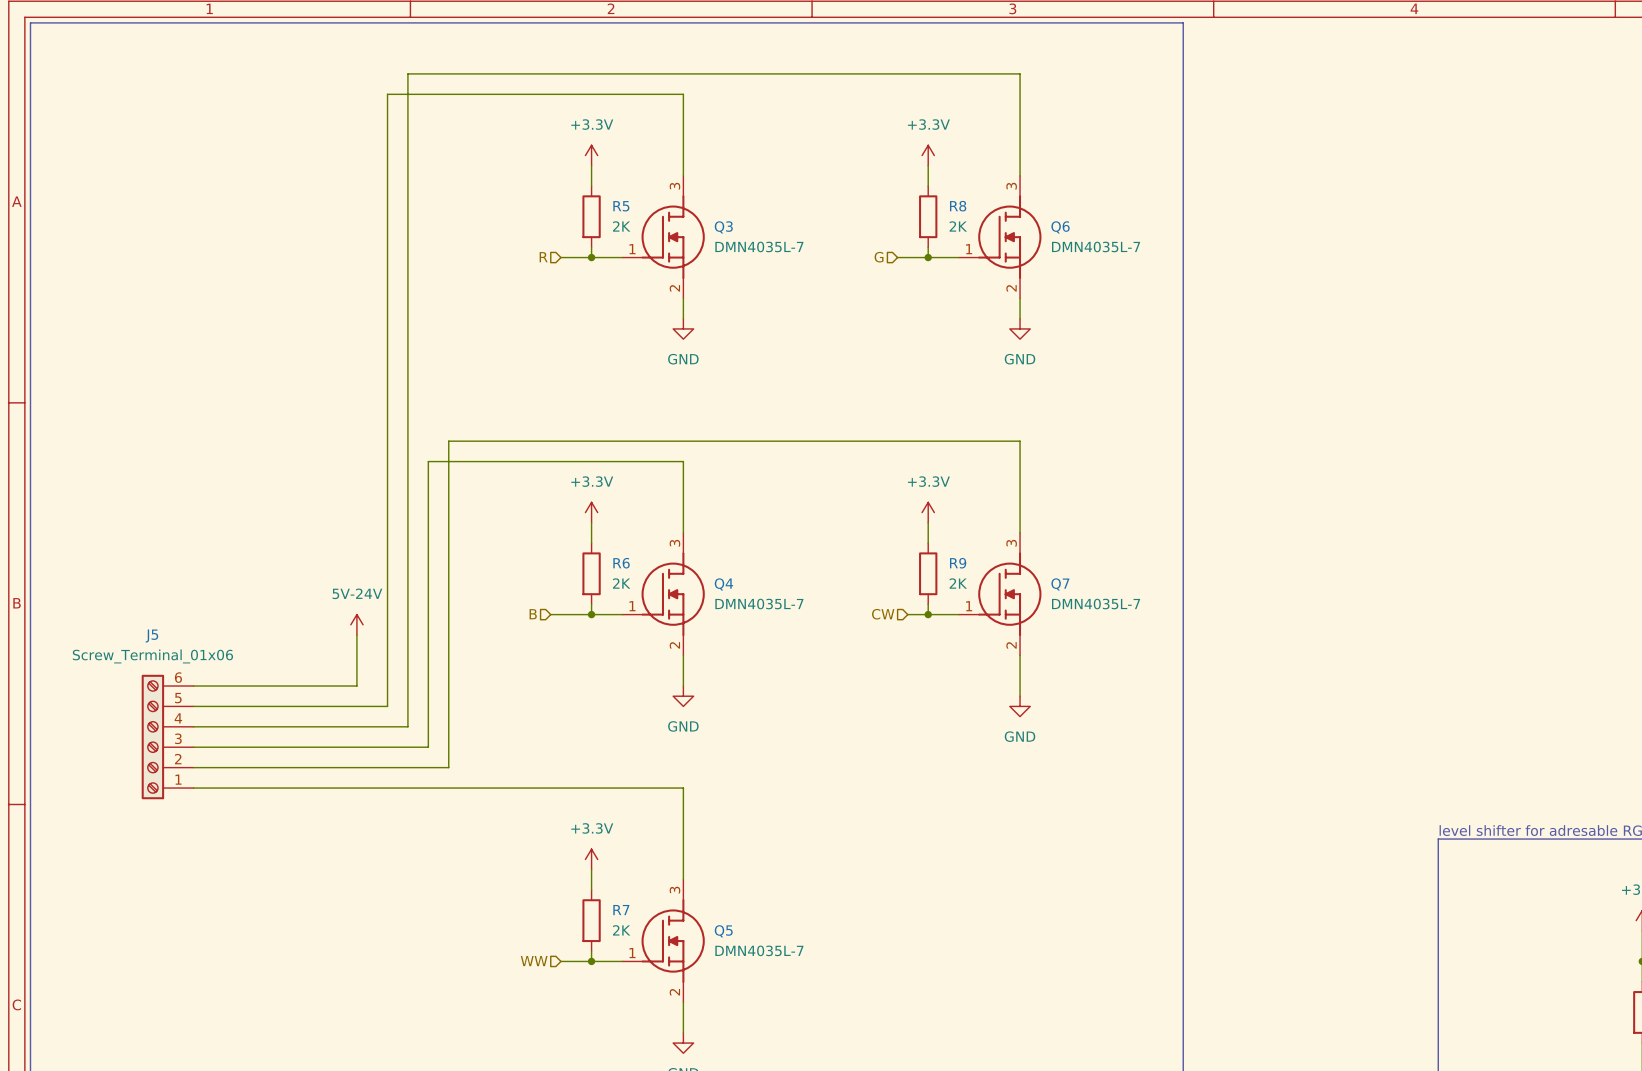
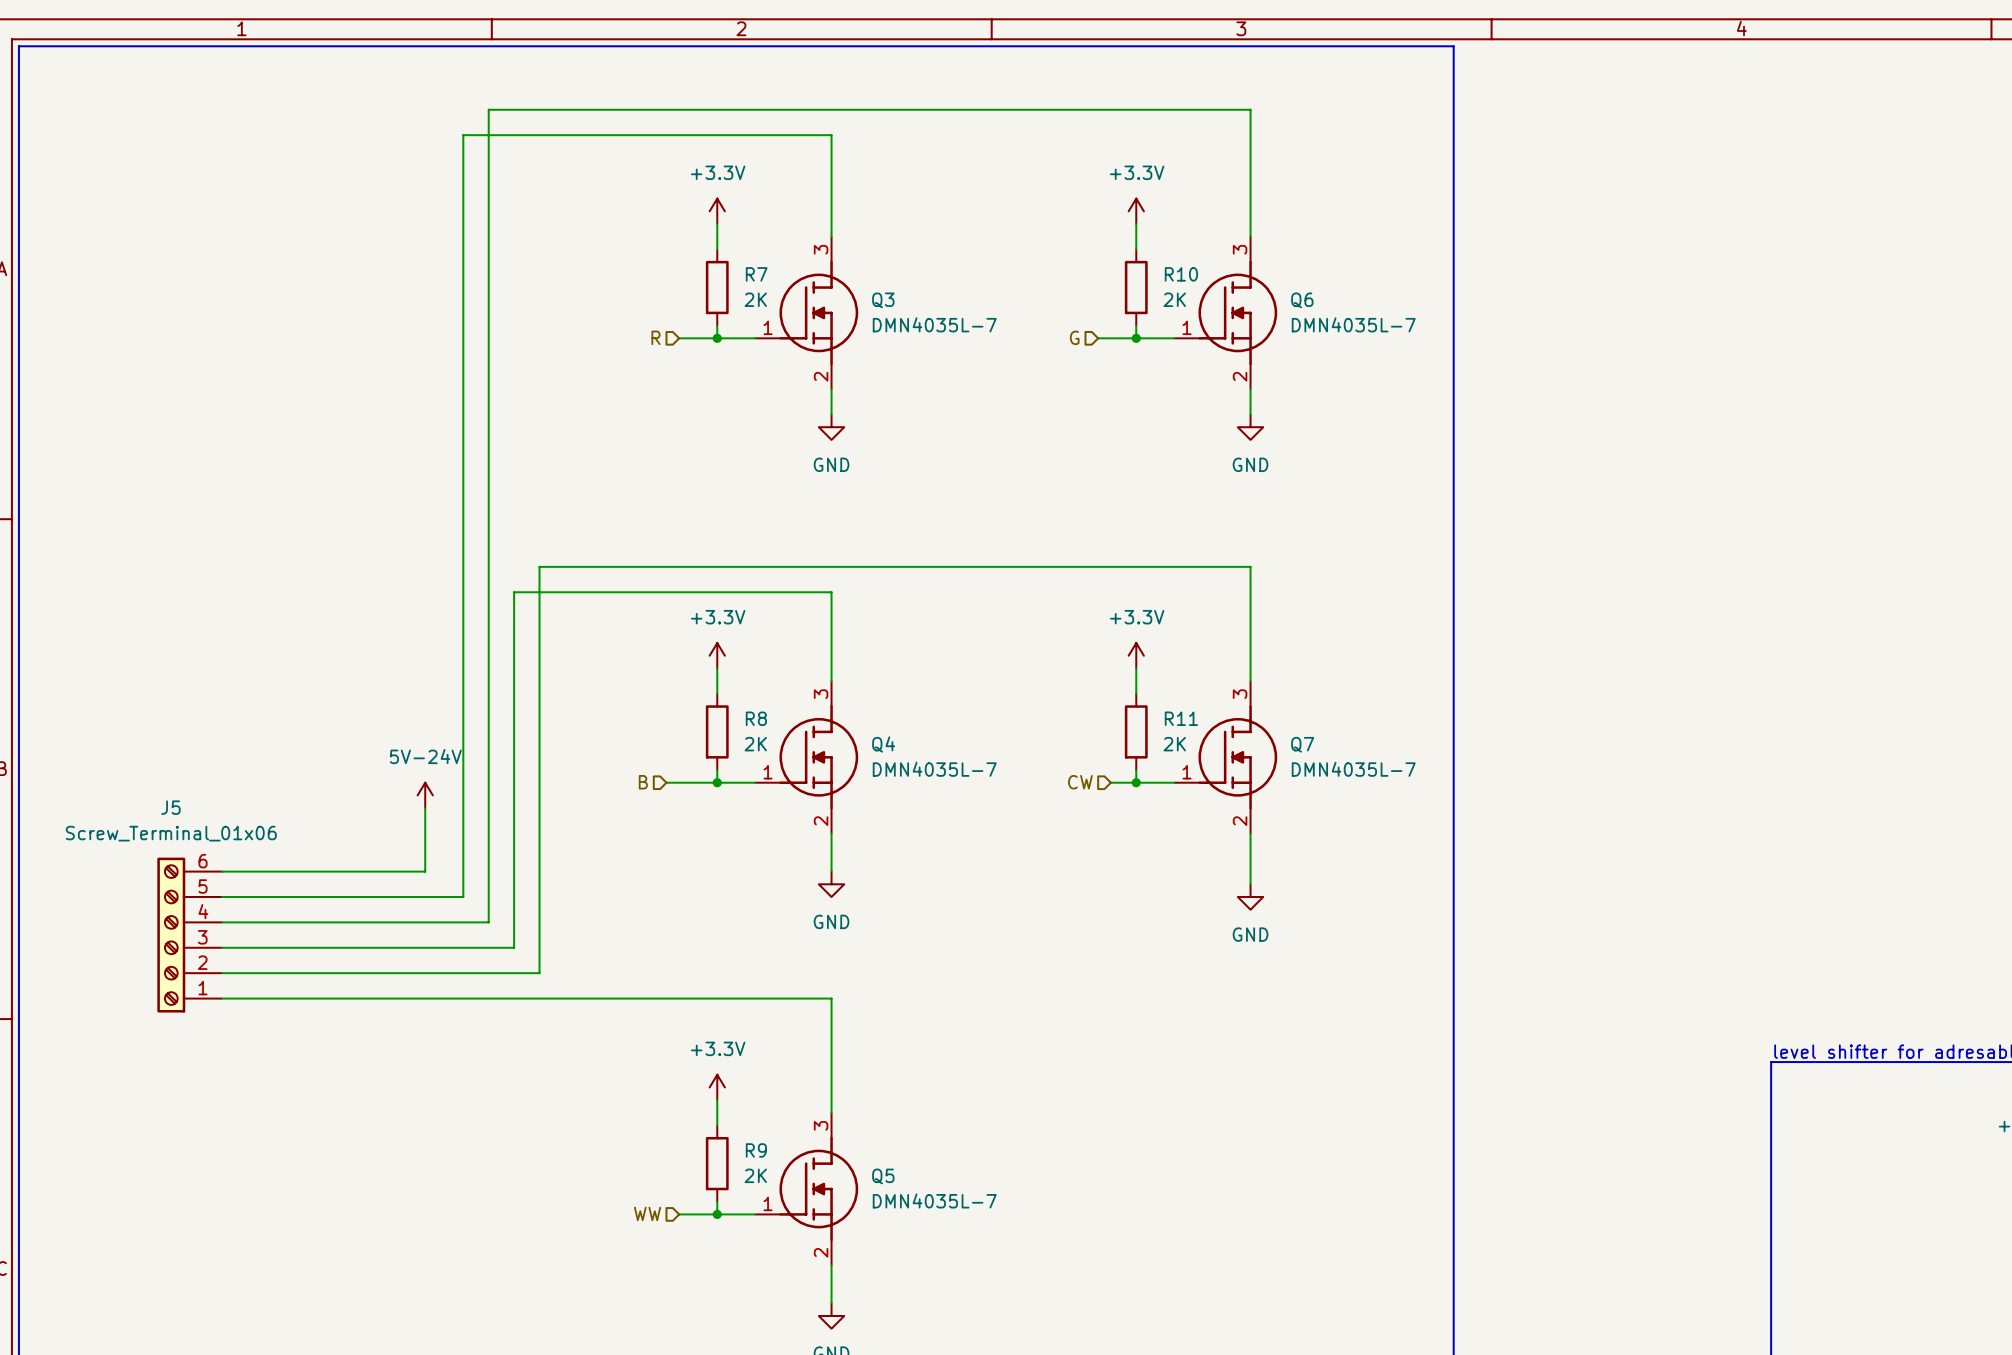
R5 name: R5 (621, 206) -> R7 (756, 274)
R8 name: R8 (958, 206) -> R10 (1181, 274)
R6 name: R6 (621, 563) -> R8 (756, 718)
R9 name: R9 (958, 563) -> R11 (1181, 718)
R7 name: R7 (621, 910) -> R9 (756, 1150)

